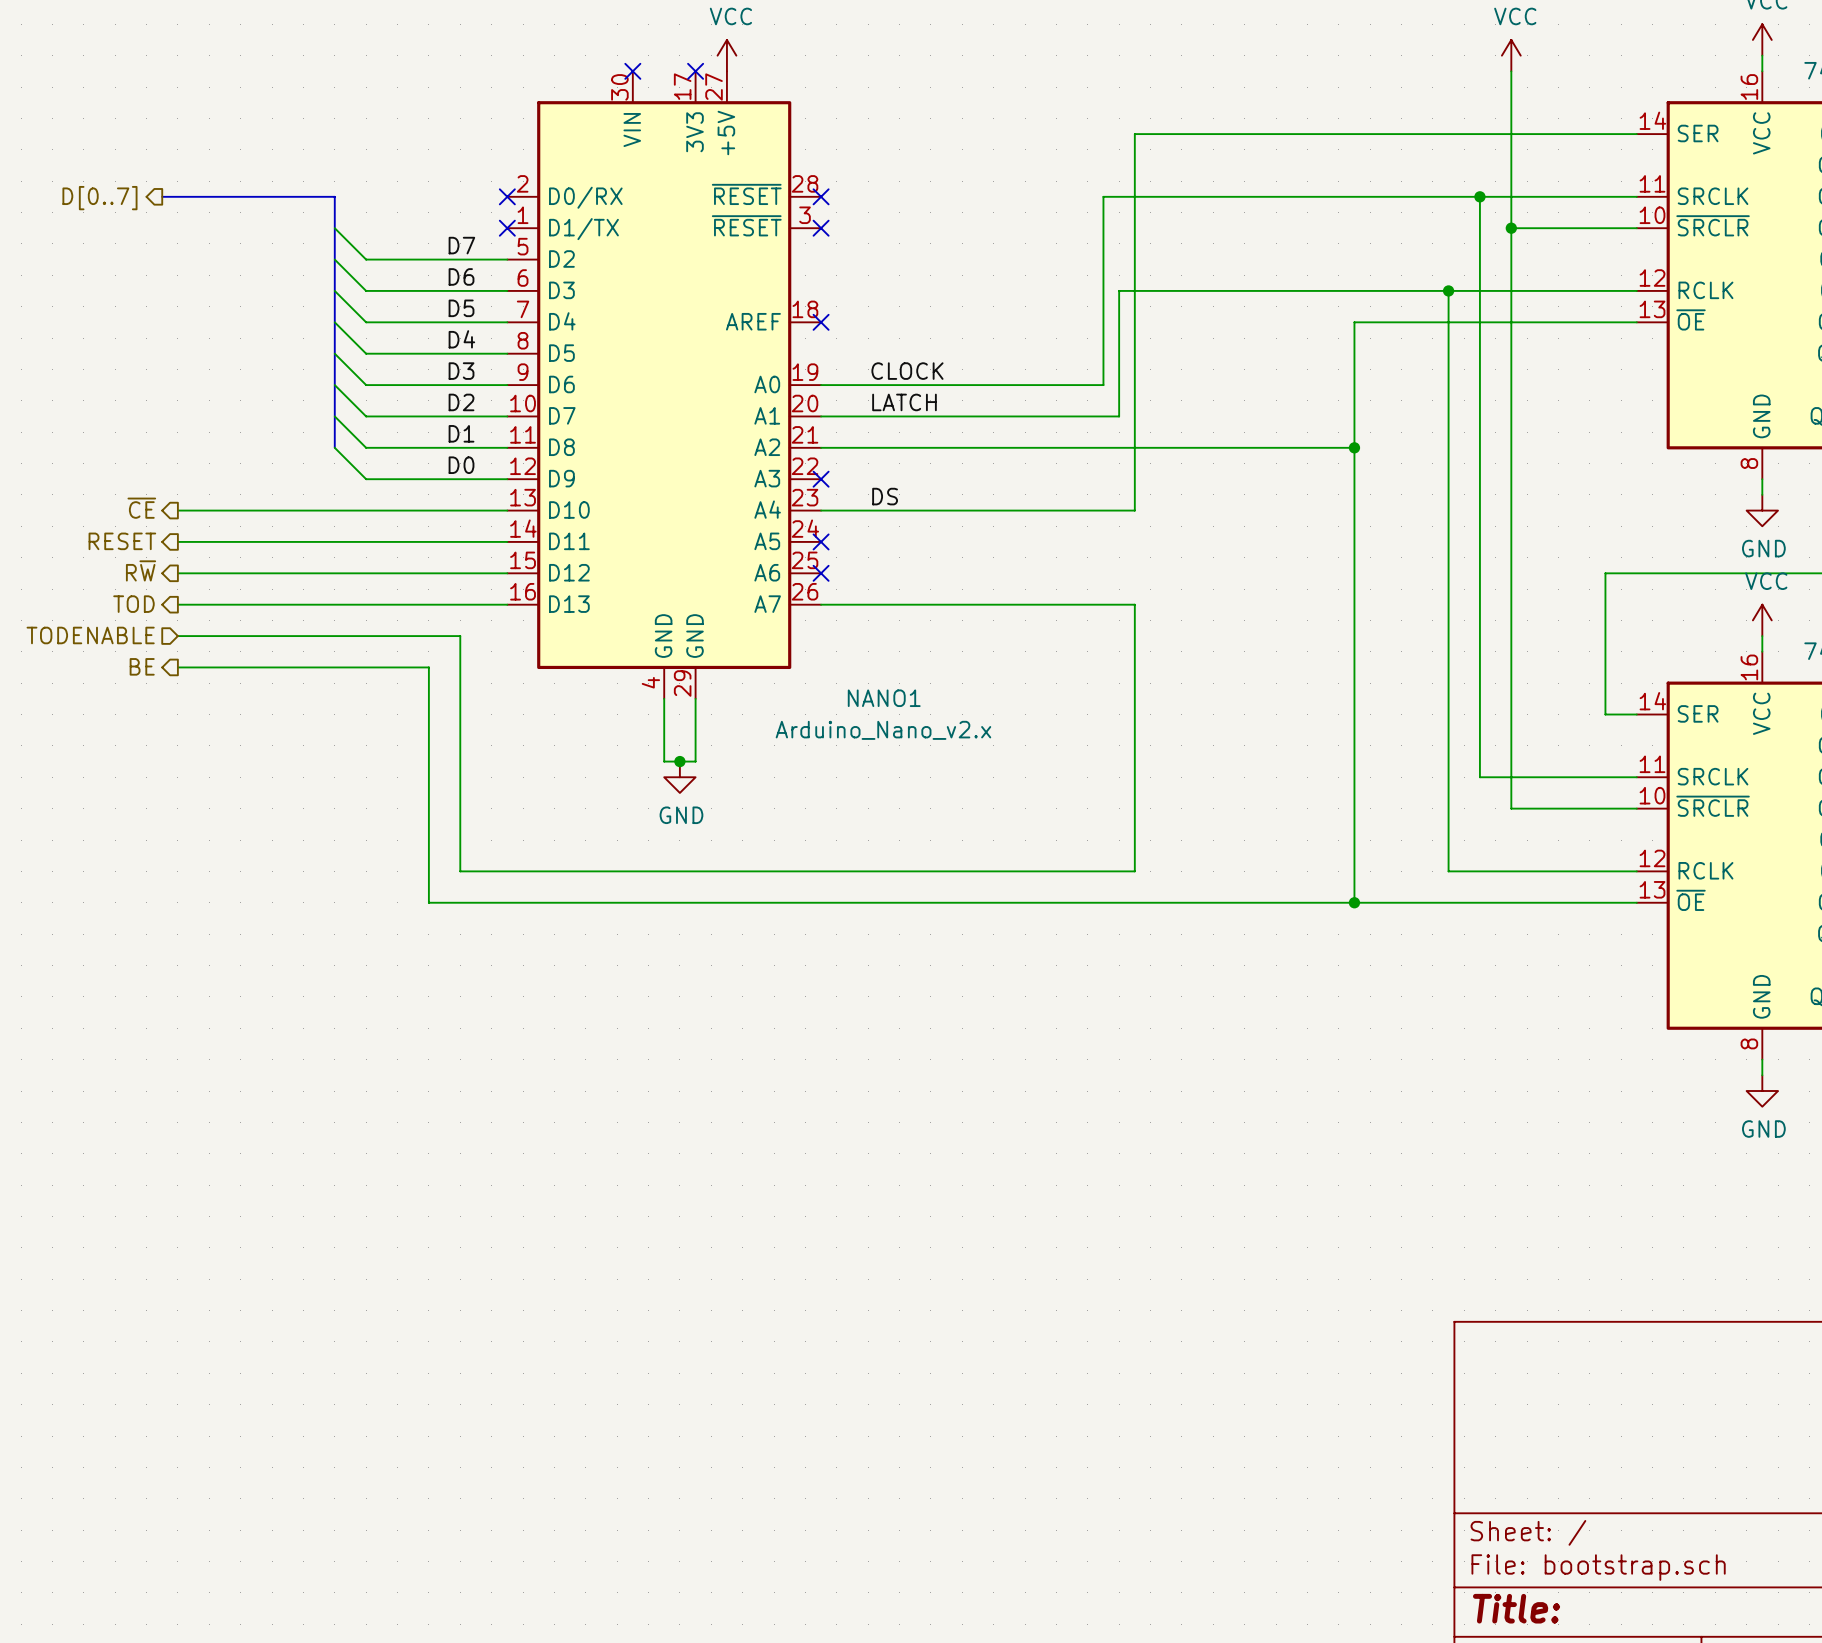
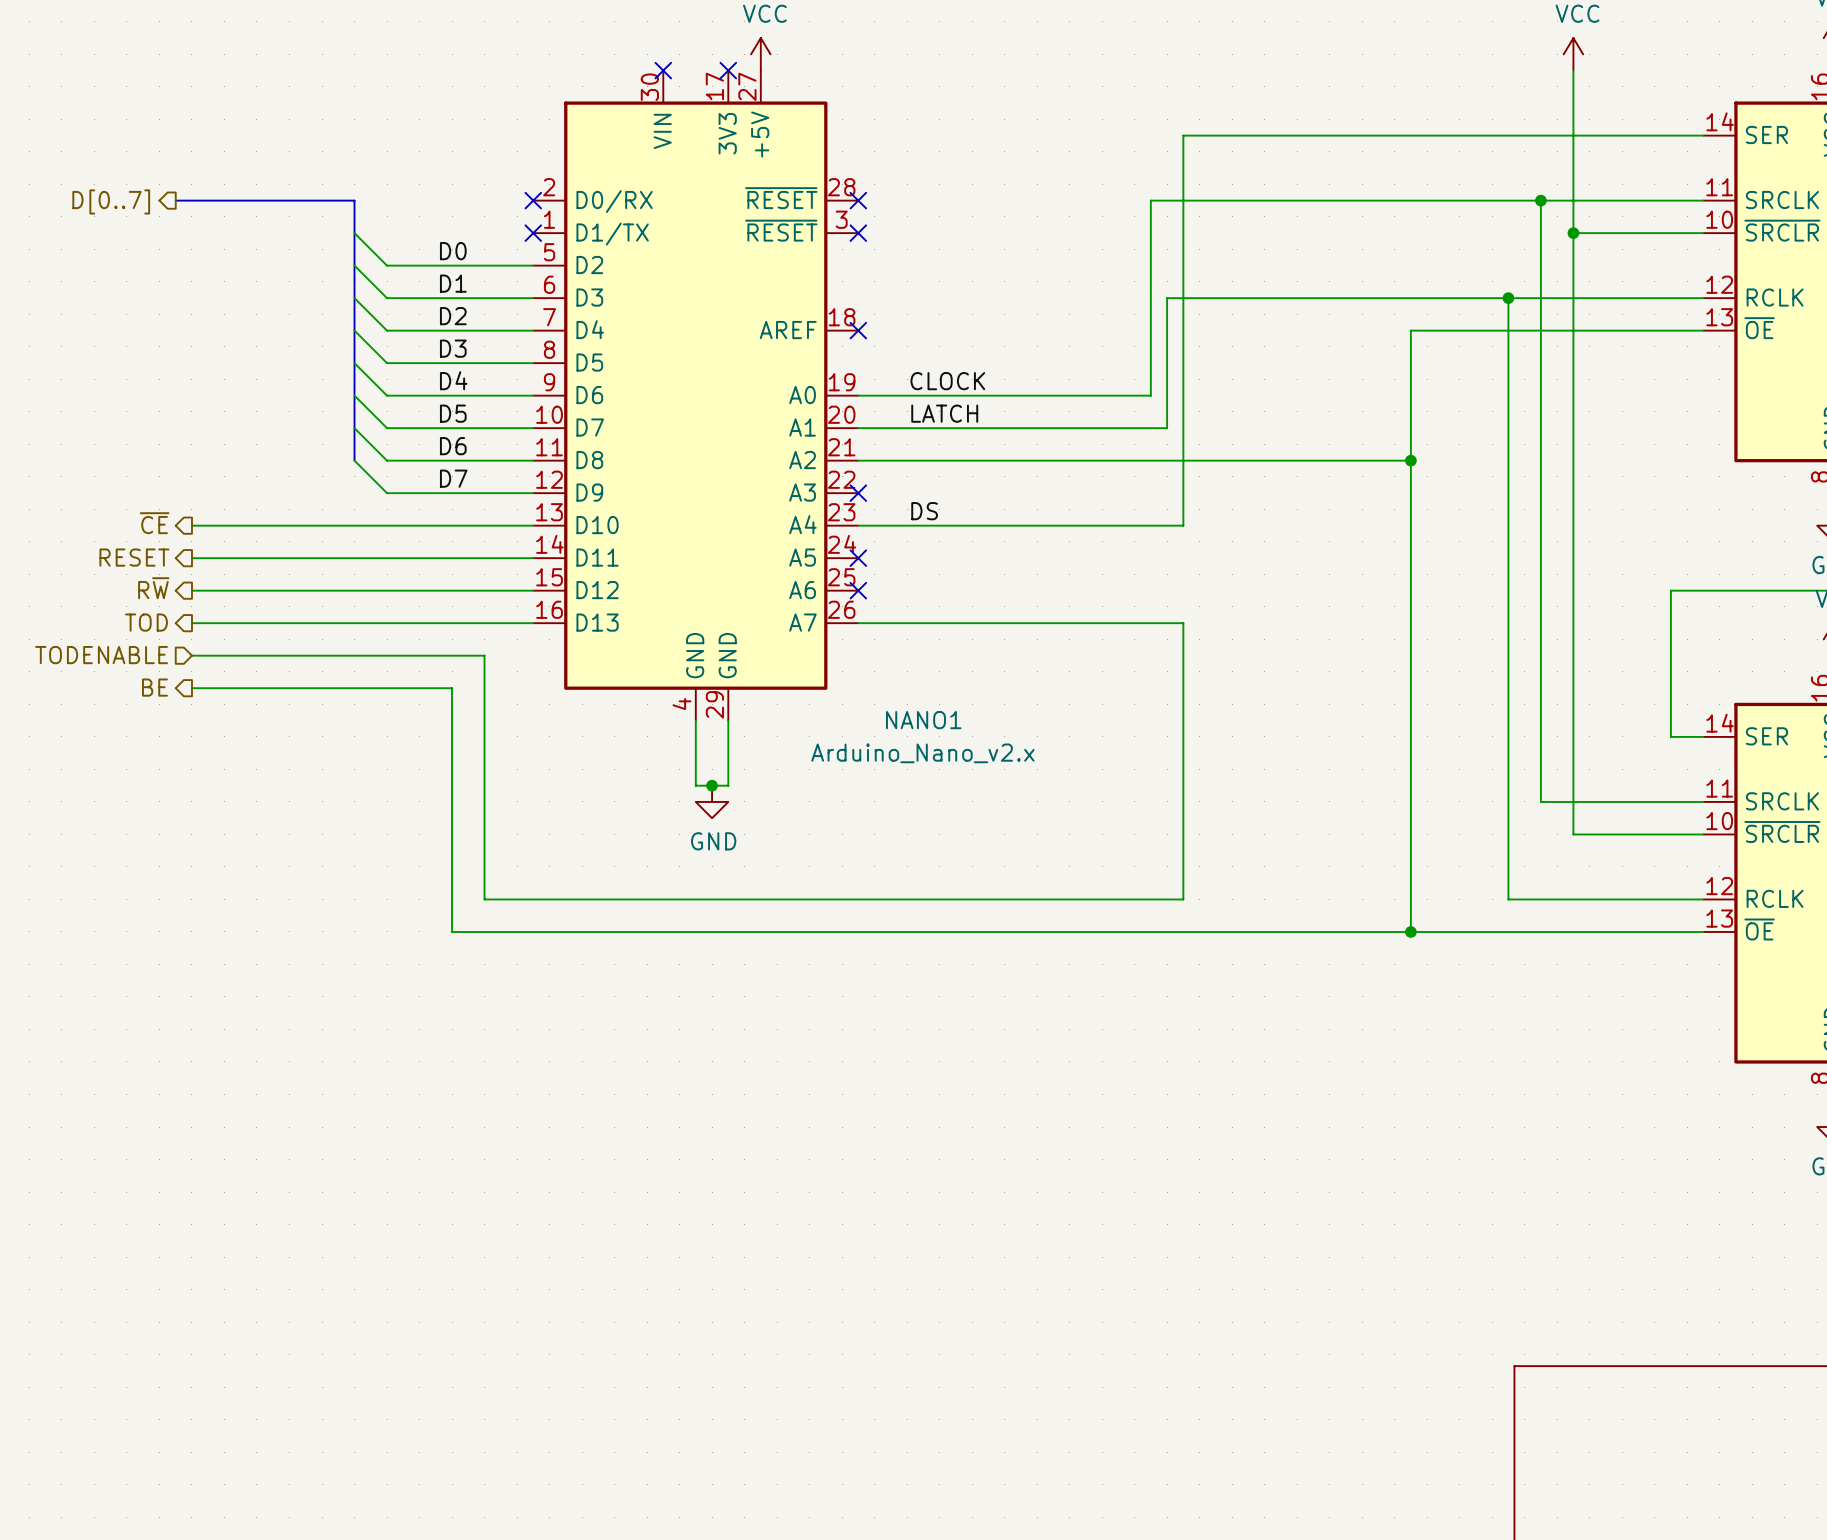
label position: D7 (461, 245) -> D7 (453, 478)
label position: D6 (461, 276) -> D6 (453, 446)
label position: D5 (461, 308) -> D5 (453, 413)
label position: D4 (461, 339) -> D4 (453, 380)
label position: D3 (461, 371) -> D3 (453, 348)
label position: D2 (461, 402) -> D2 (453, 316)
label position: D1 (461, 433) -> D1 (453, 283)
label position: D0 (461, 465) -> D0 (453, 251)

